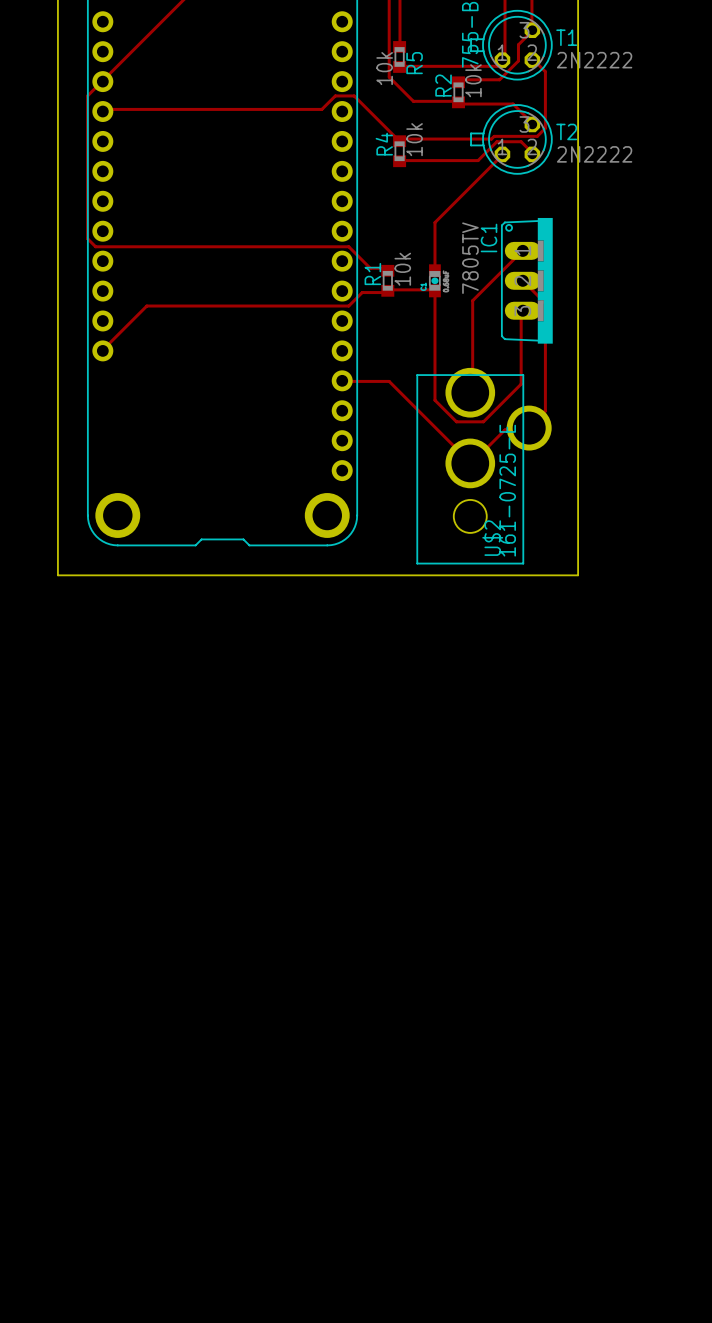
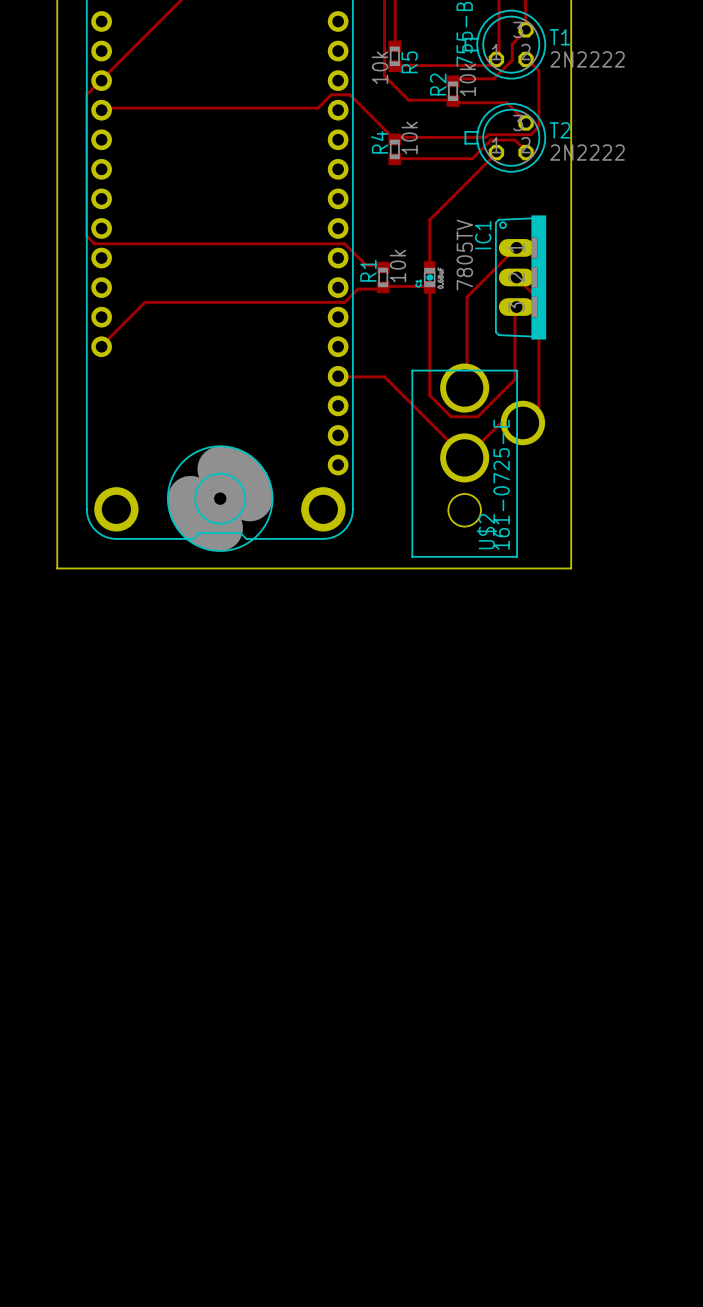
part: none -> (220, 498)

